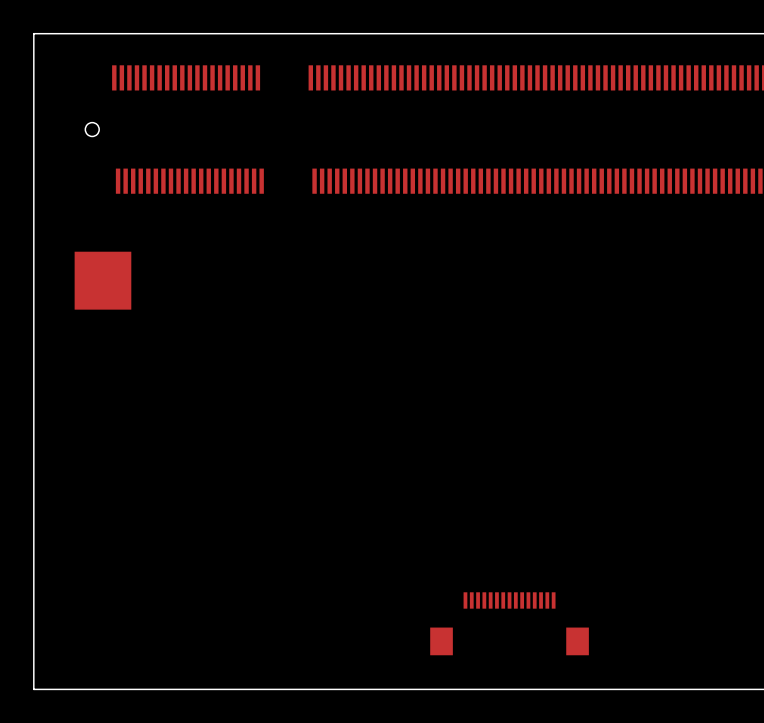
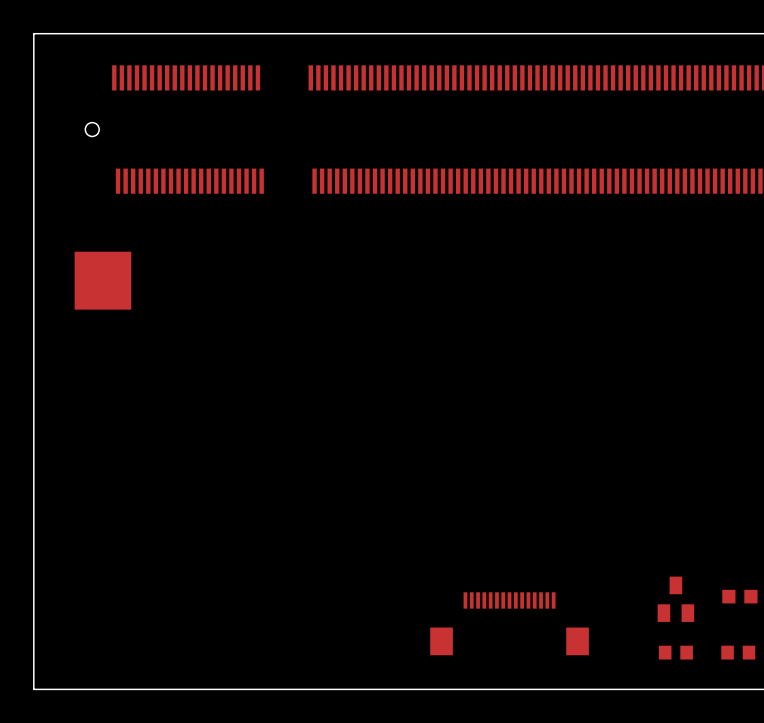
part: none -> (739, 596)
part: none -> (675, 599)
part: none -> (675, 652)
part: none -> (738, 652)

